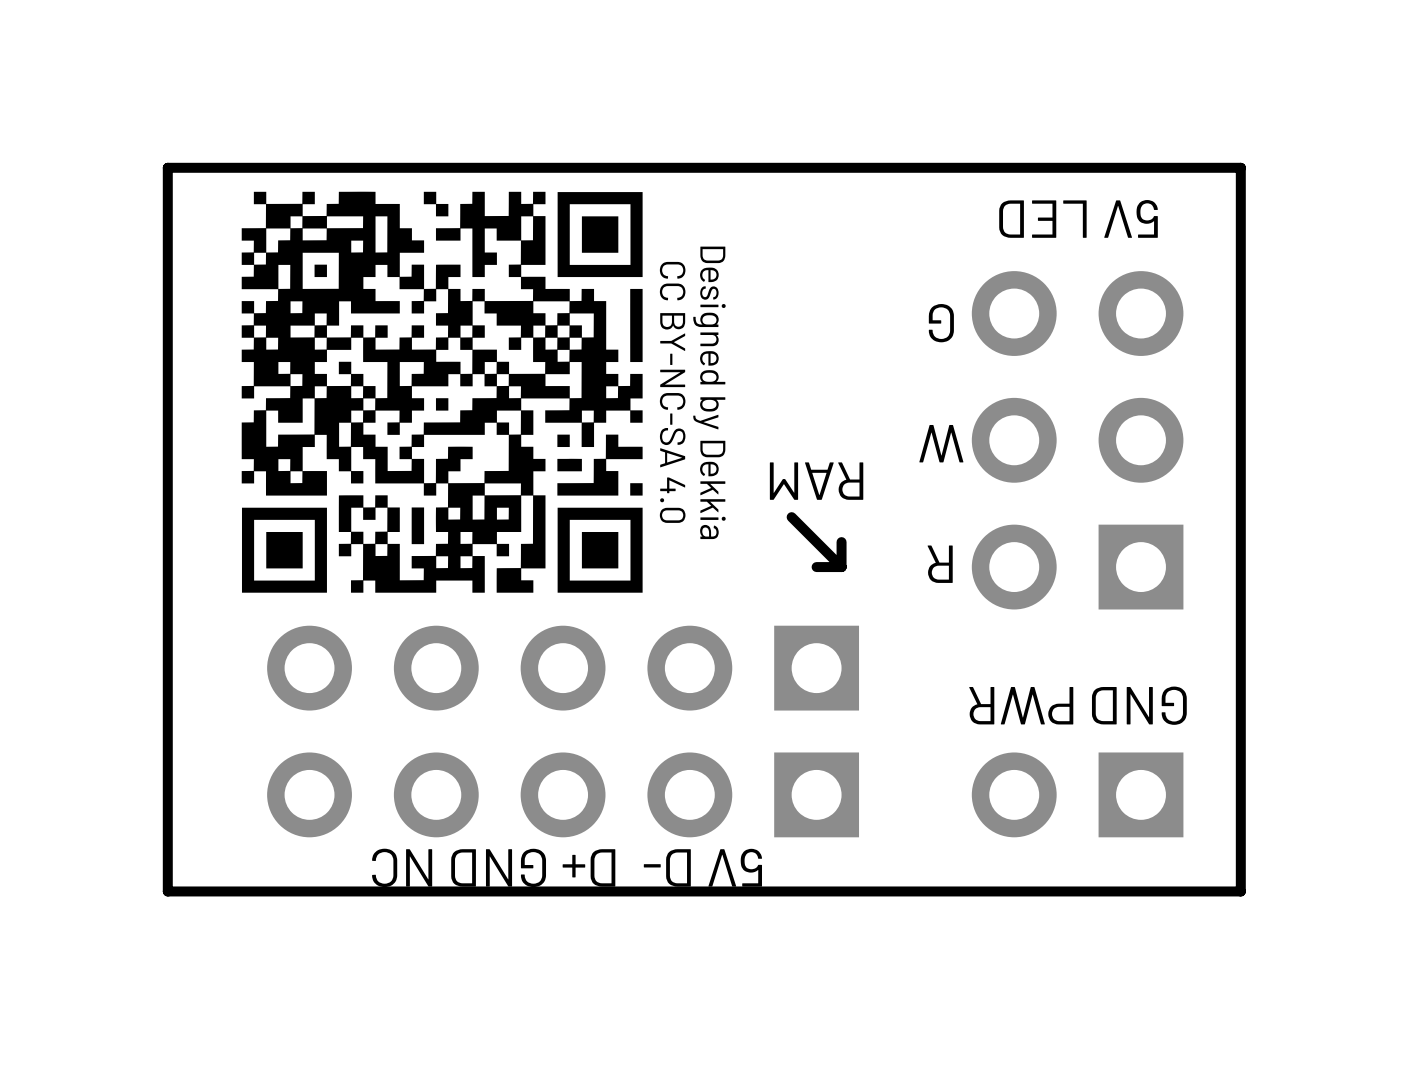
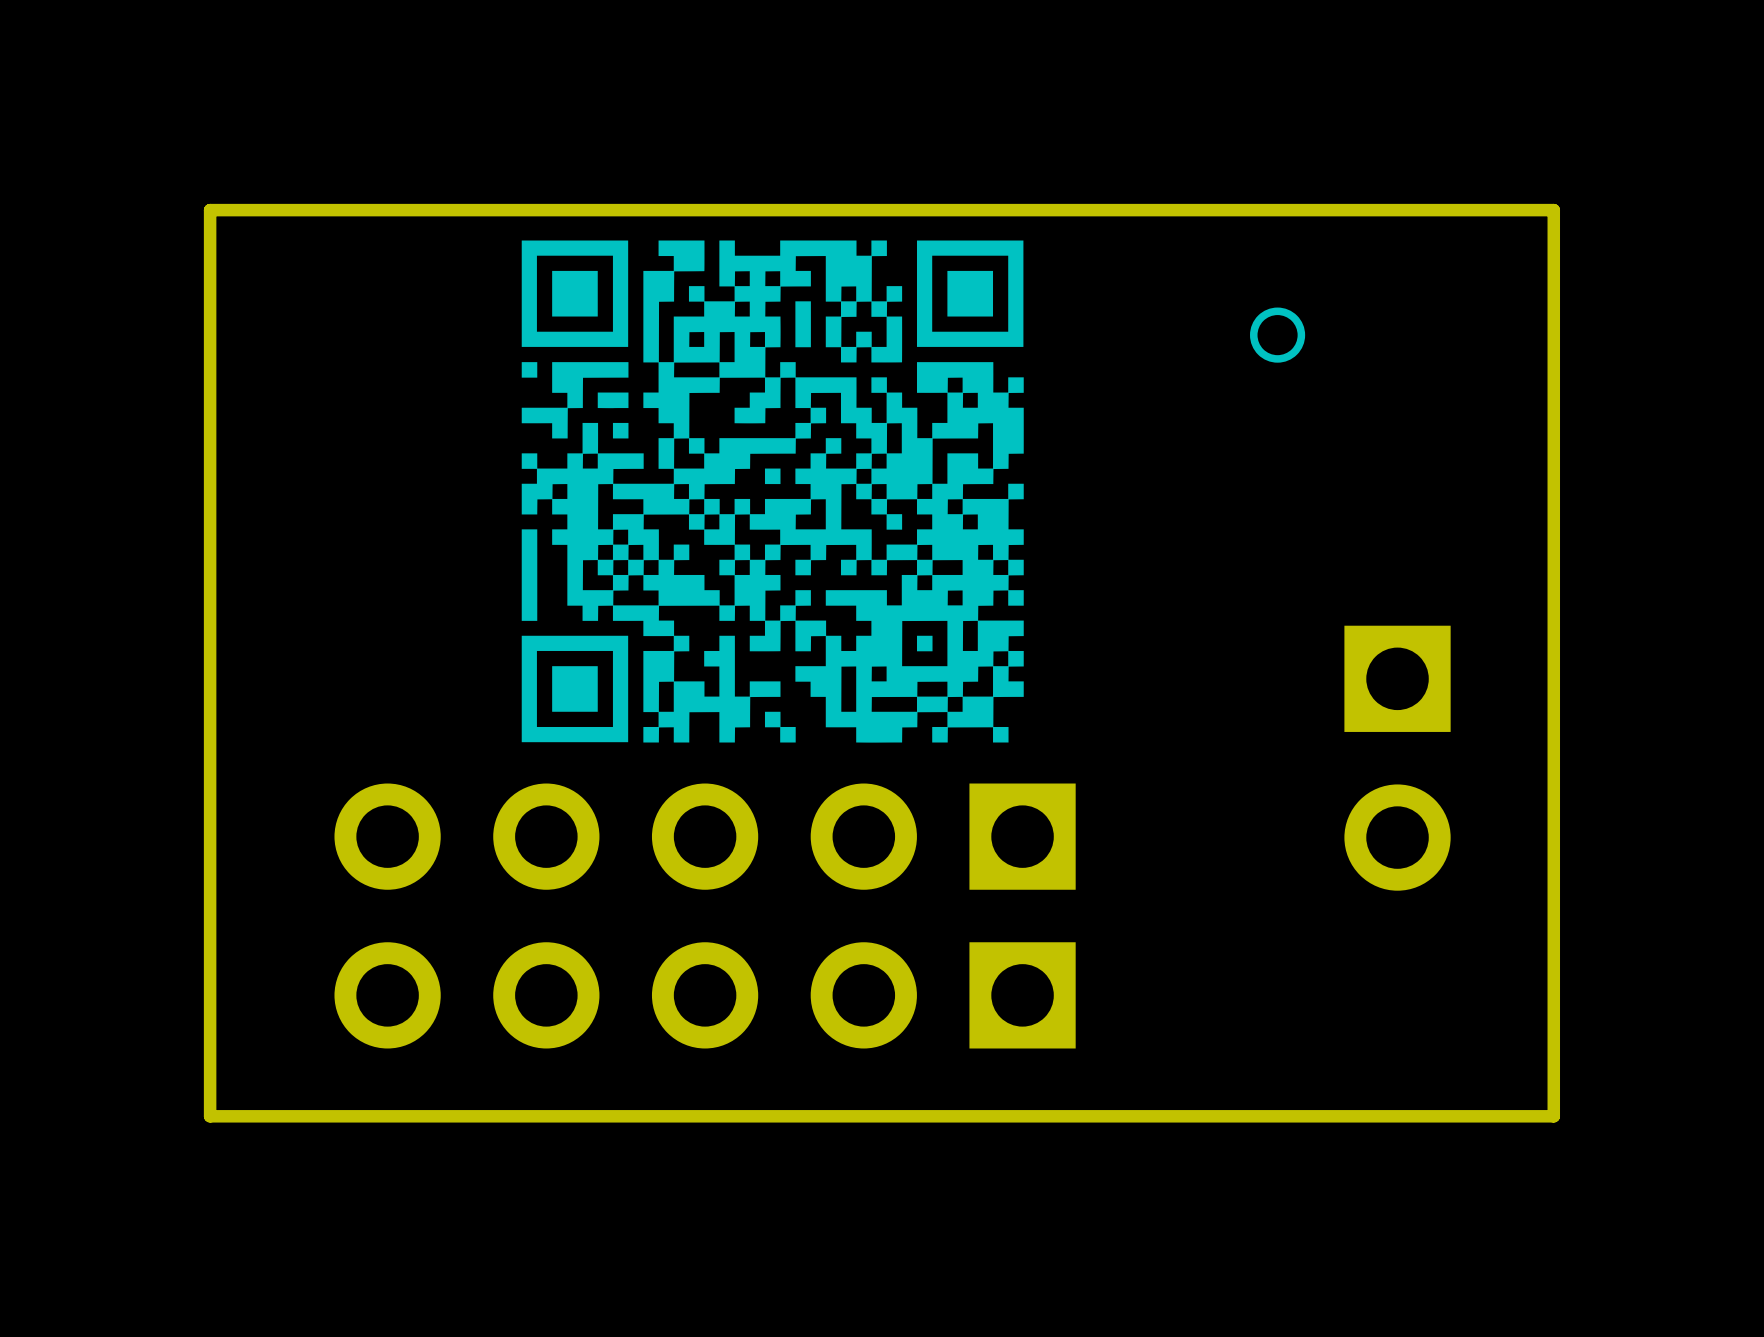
drawing: [241, 191, 643, 593] -> none
drawing: none -> [521, 240, 1024, 743]
text: 5V LED (1078, 218) -> none
part: none -> (1277, 335)
text: G (941, 323) -> none
text: CC BY-NC-SA 4.0 (672, 392) -> none
text: Designed by Dekkia (709, 392) -> none
part: (1077, 440) -> none
text: W (941, 443) -> none
text: RAM (816, 481) -> none
line: (791, 517) (841, 567) -> none
line: (841, 542) (841, 567) -> none
text: R (940, 564) -> none
line: (841, 567) (816, 567) -> none
text: GND PWR (1078, 705) -> none
part rotation: 0° (1077, 794) -> 90° counterclockwise (1397, 758)
part position: (1077, 794) -> (1397, 758)
text: 5V D- D+ GND NC (567, 867) -> none

